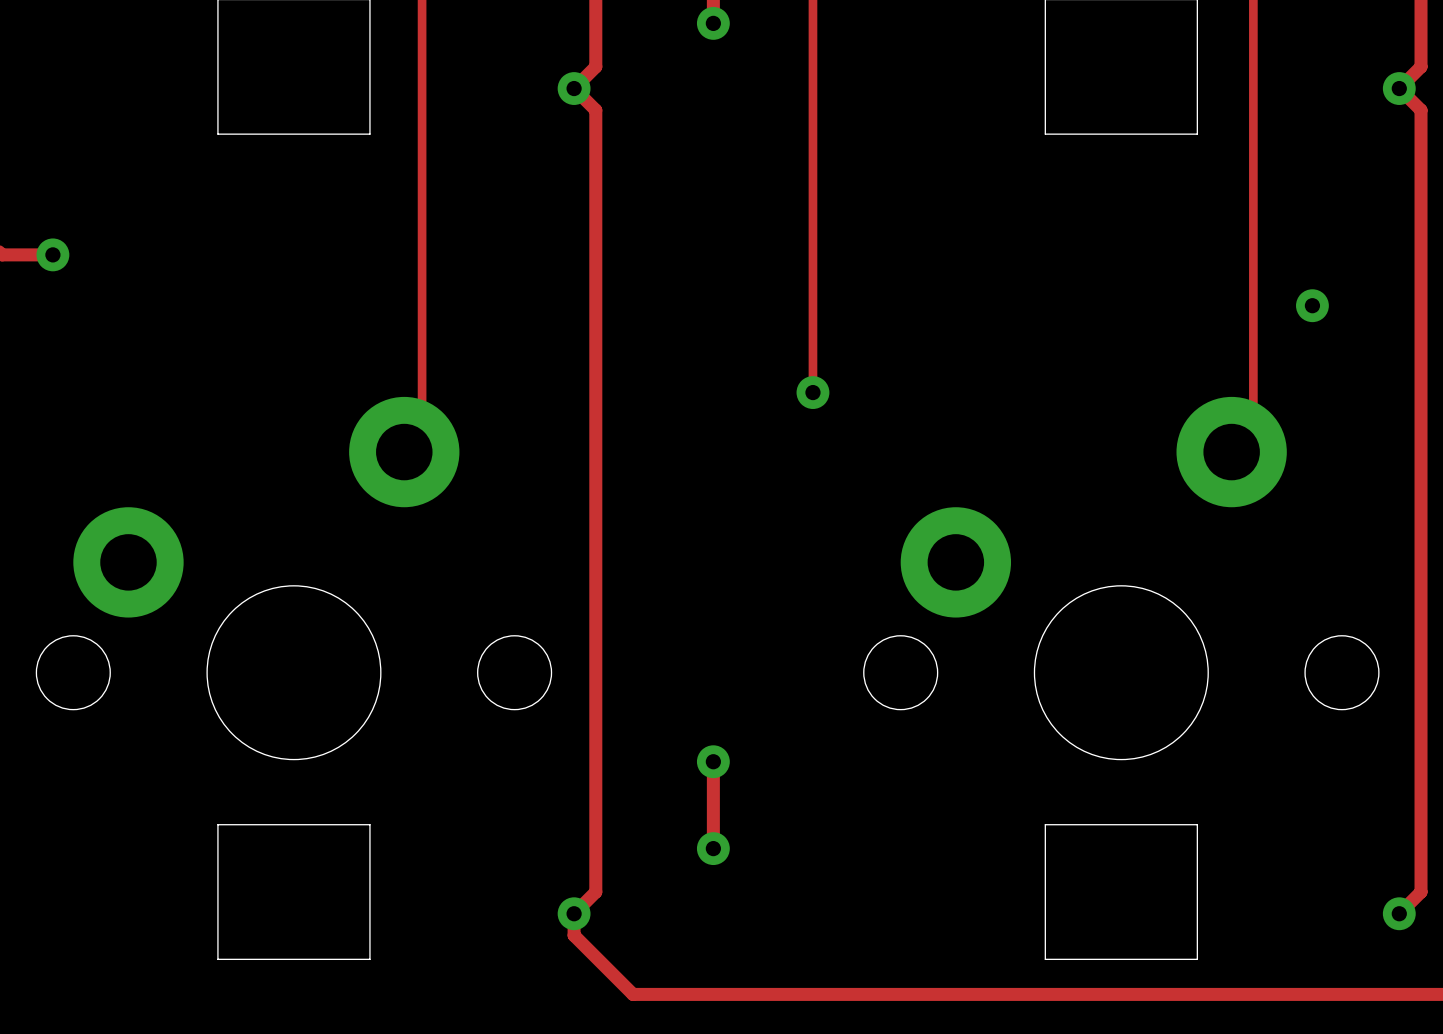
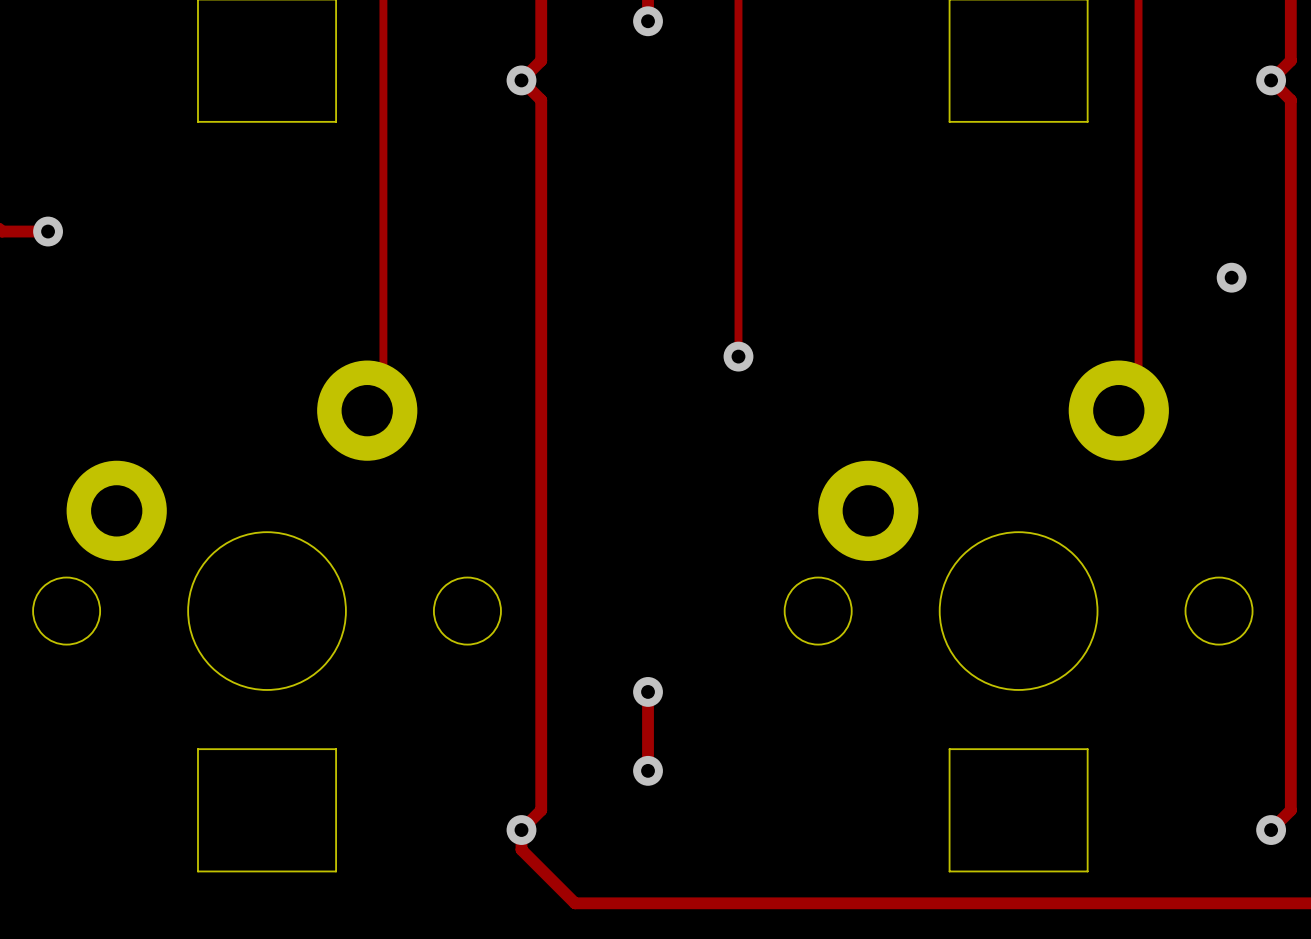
via position: (1312, 305) -> (1231, 277)

